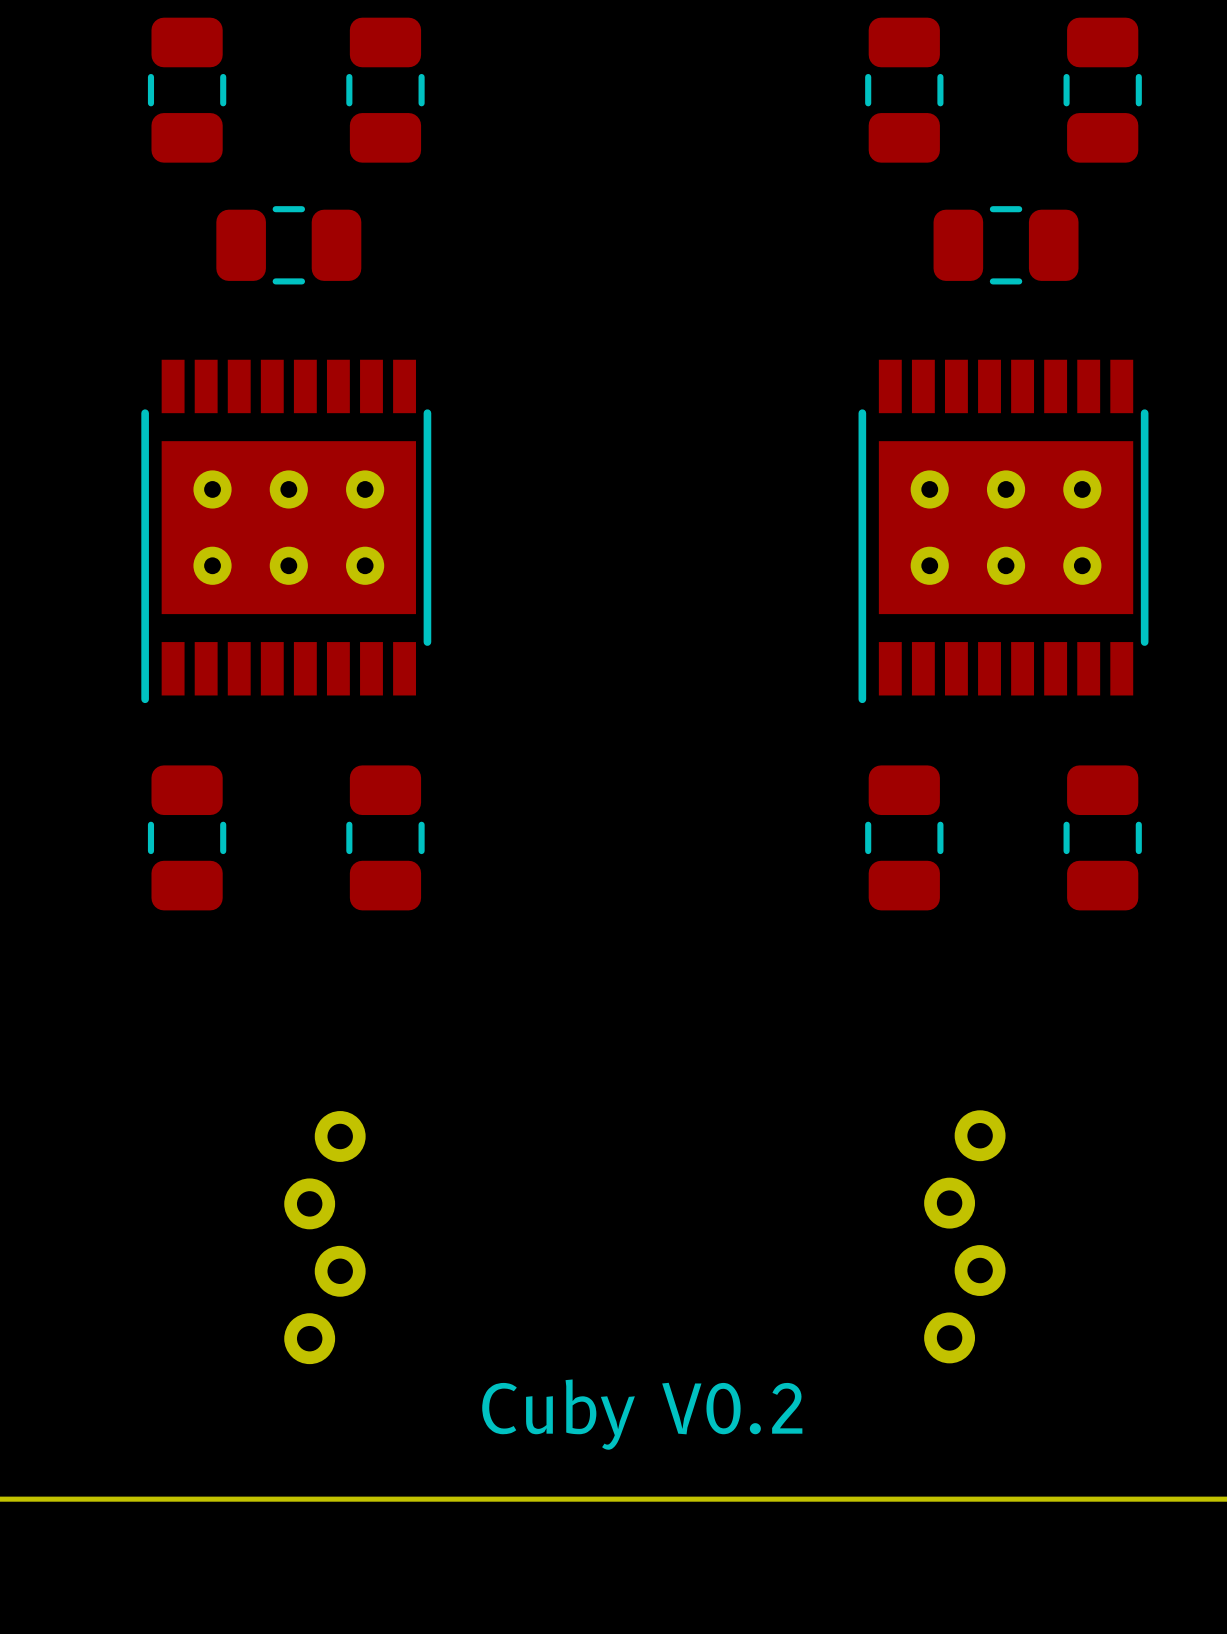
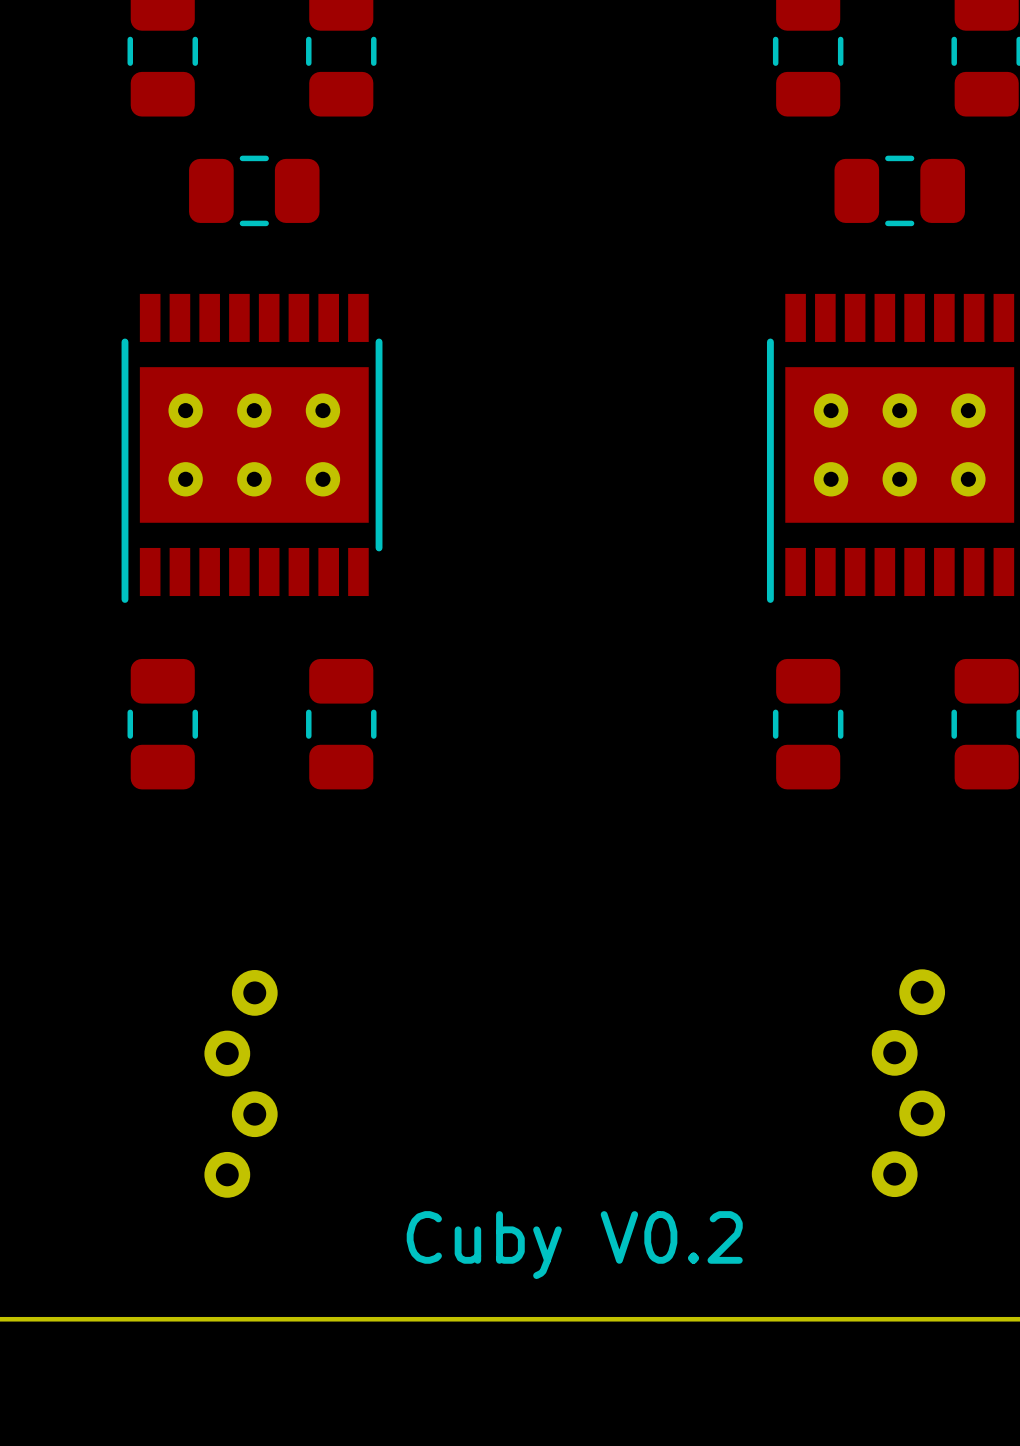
part position: (964, 1236) -> (908, 1083)
part position: (324, 1237) -> (241, 1083)

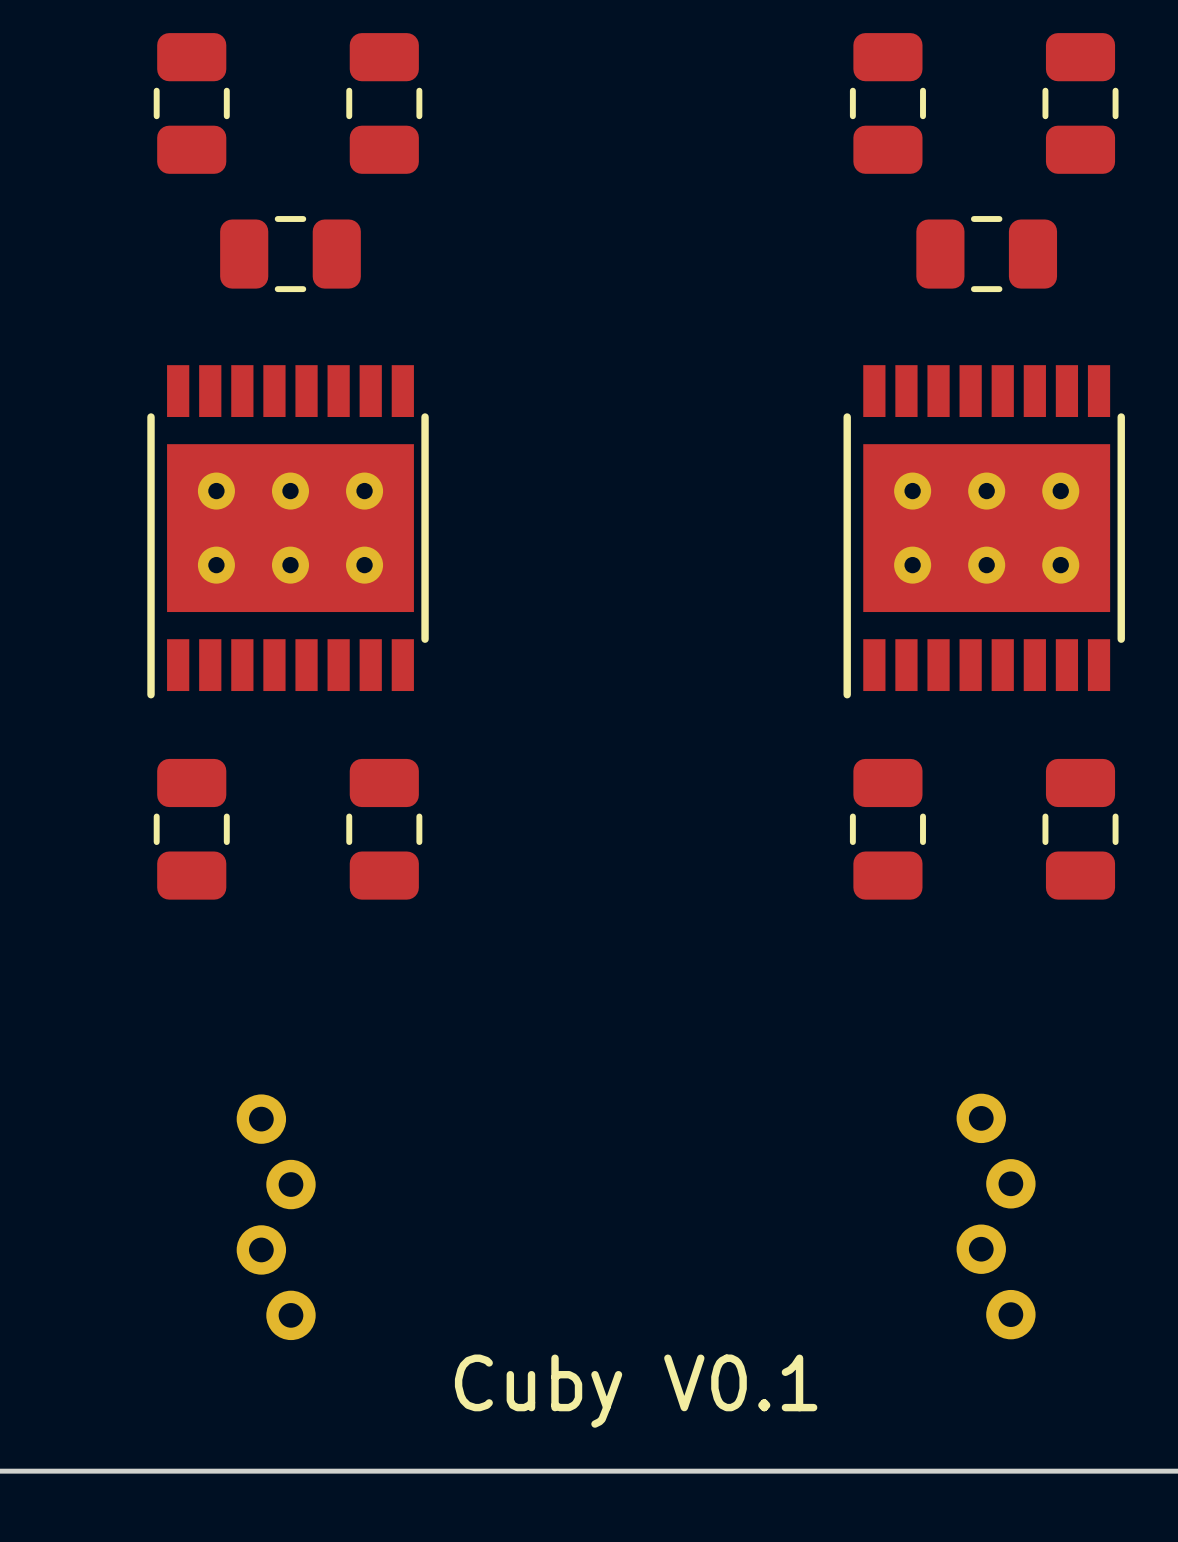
part footprint: [871, 969, 946, 1198] -> [956, 1093, 1036, 1340]
part footprint: [204, 970, 278, 1198] -> [236, 1094, 316, 1341]
text: Cuby V0.2 (574, 1245) -> Cuby V0.1 (636, 1391)

